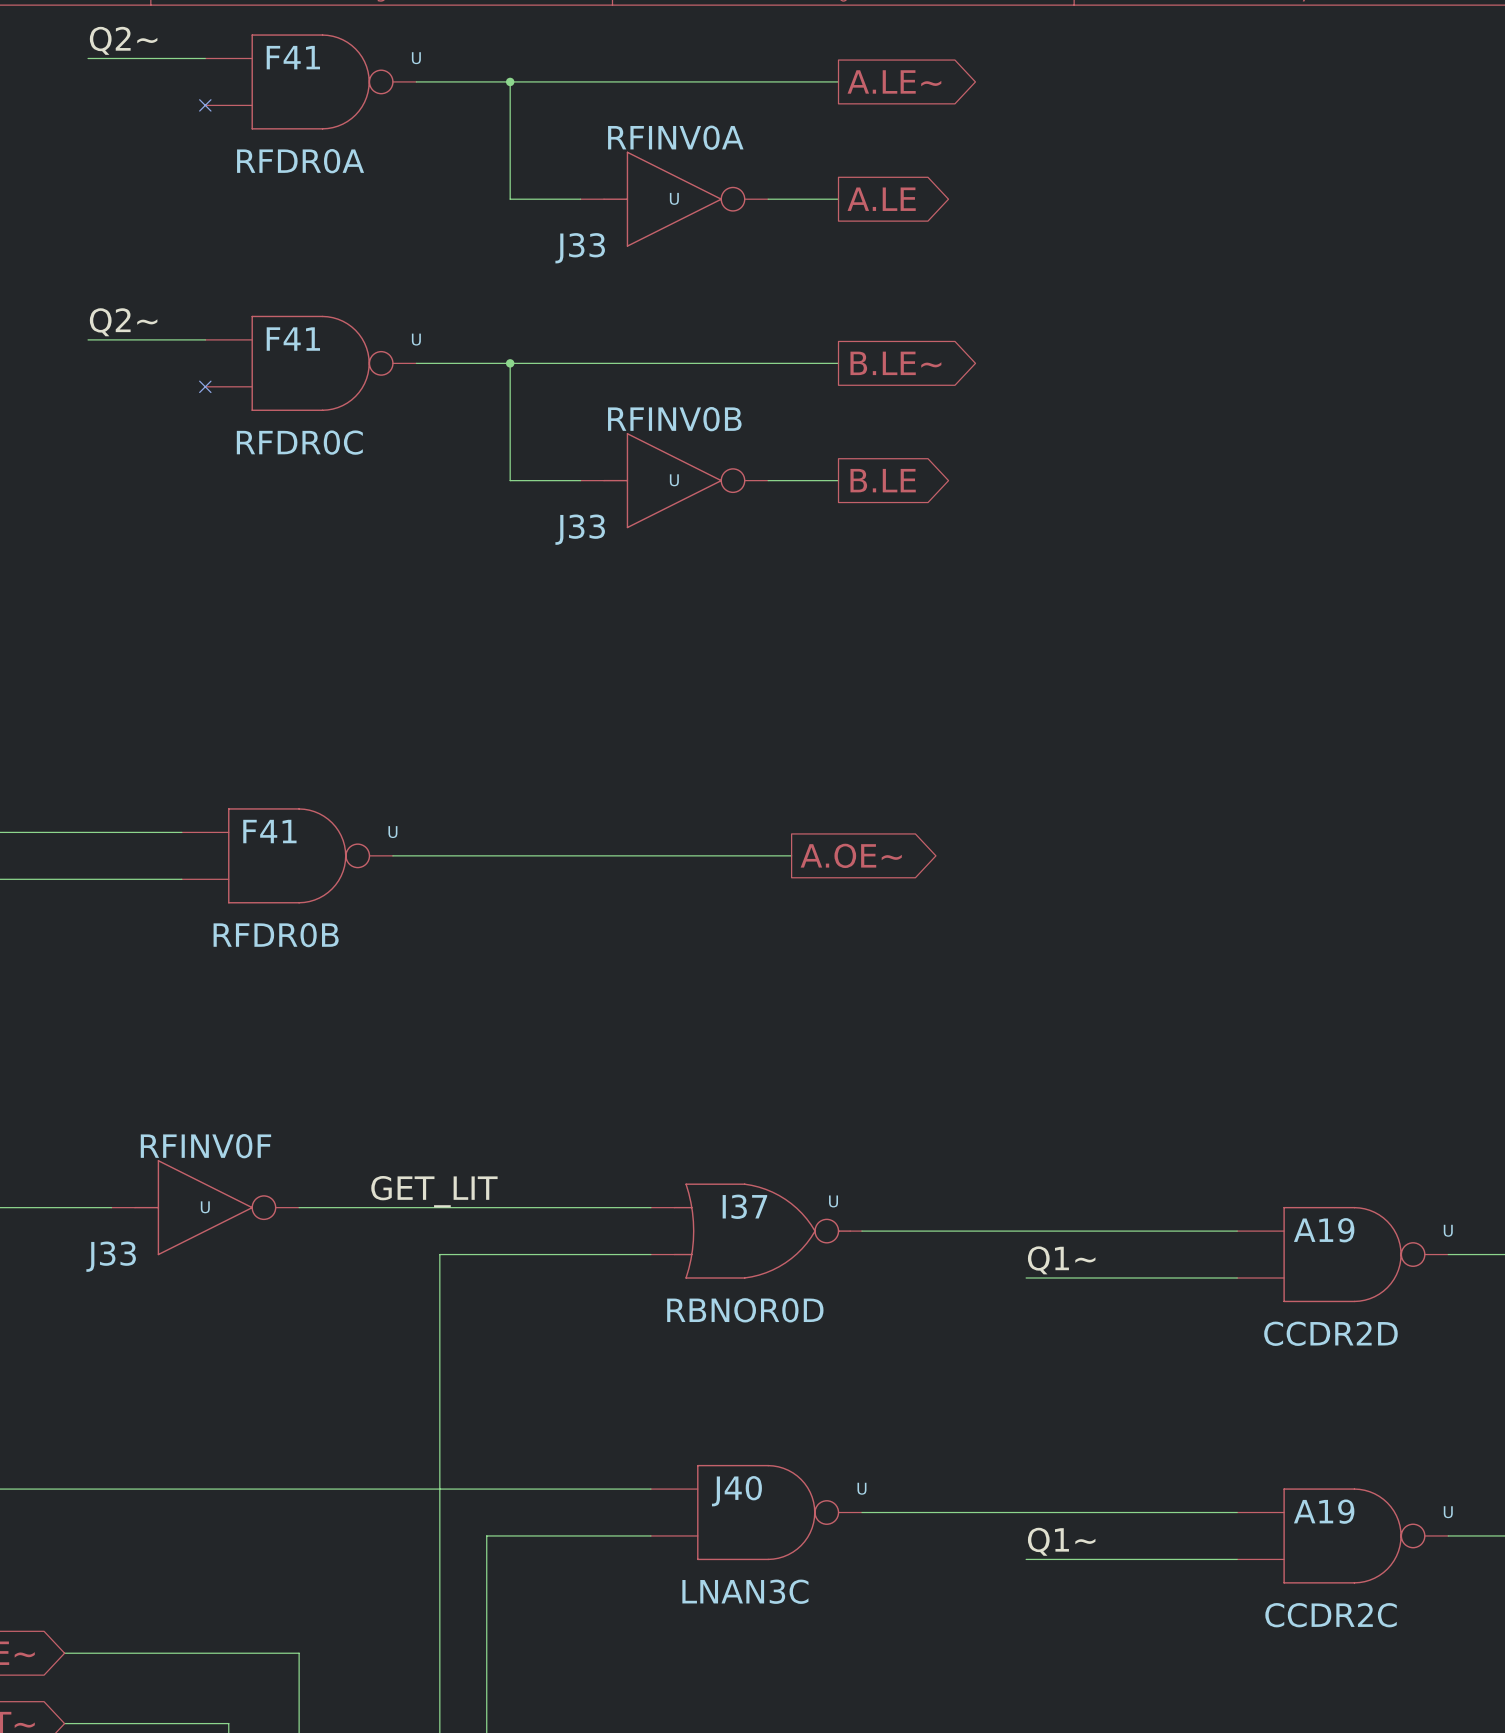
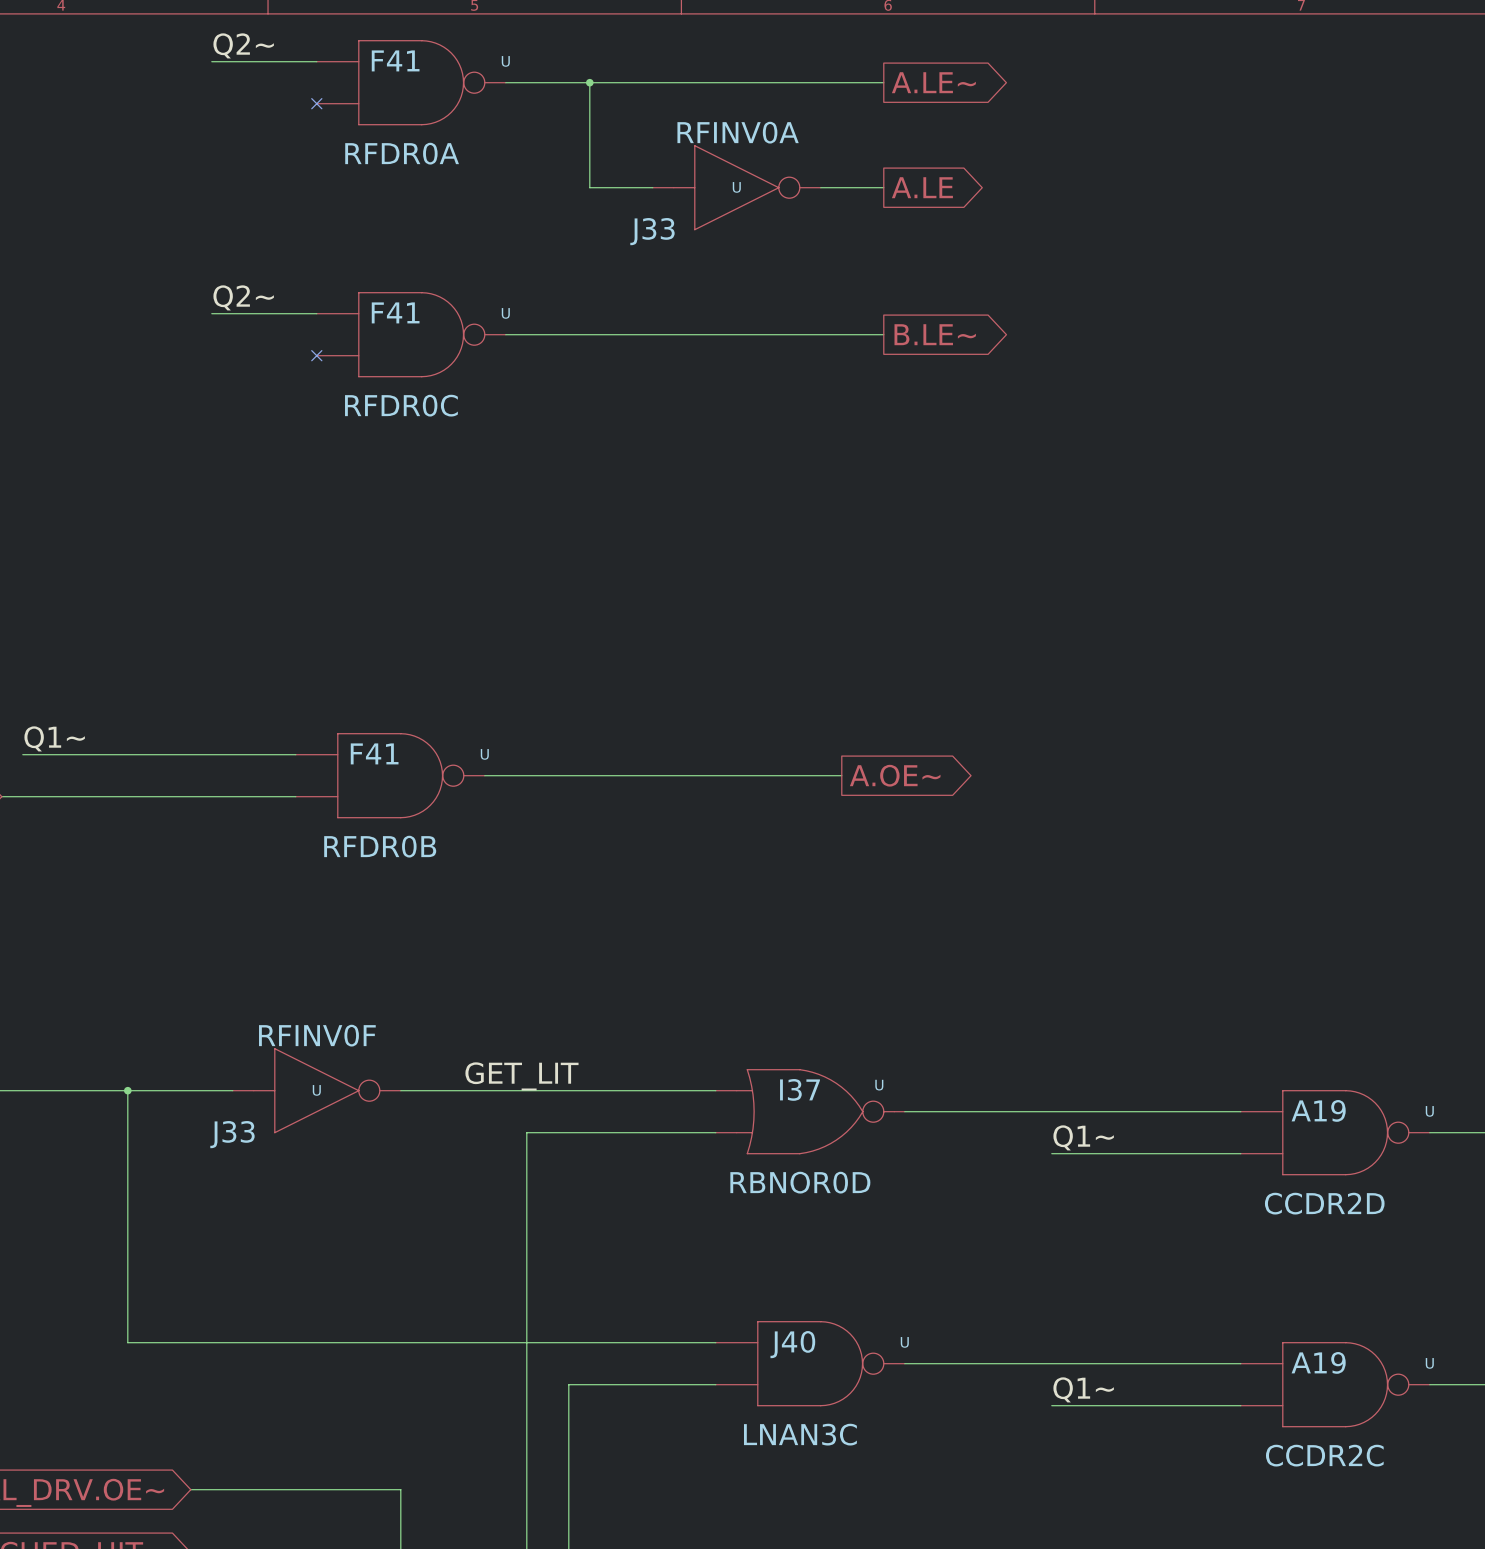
wire: (510, 363) (510, 480) (580, 480) -> none
junction: (510, 363) -> none
U: (674, 480) -> none
wire: (768, 480) (838, 480) -> none
global label: B.LE (883, 480) -> none

